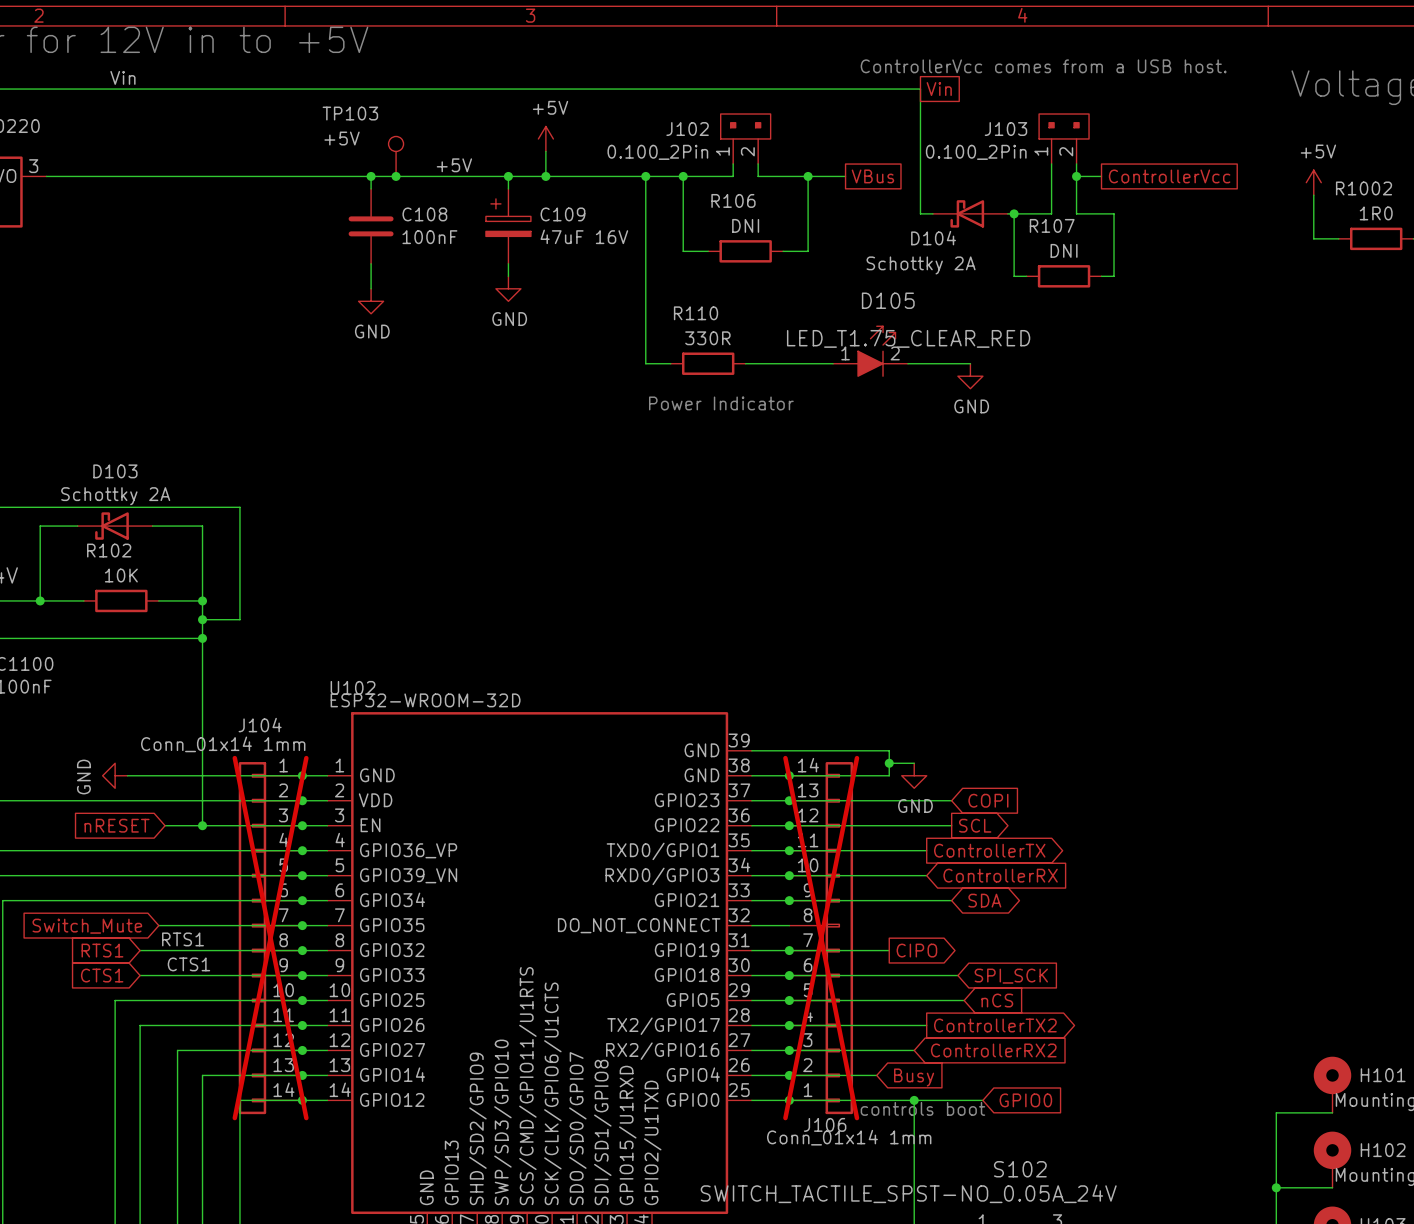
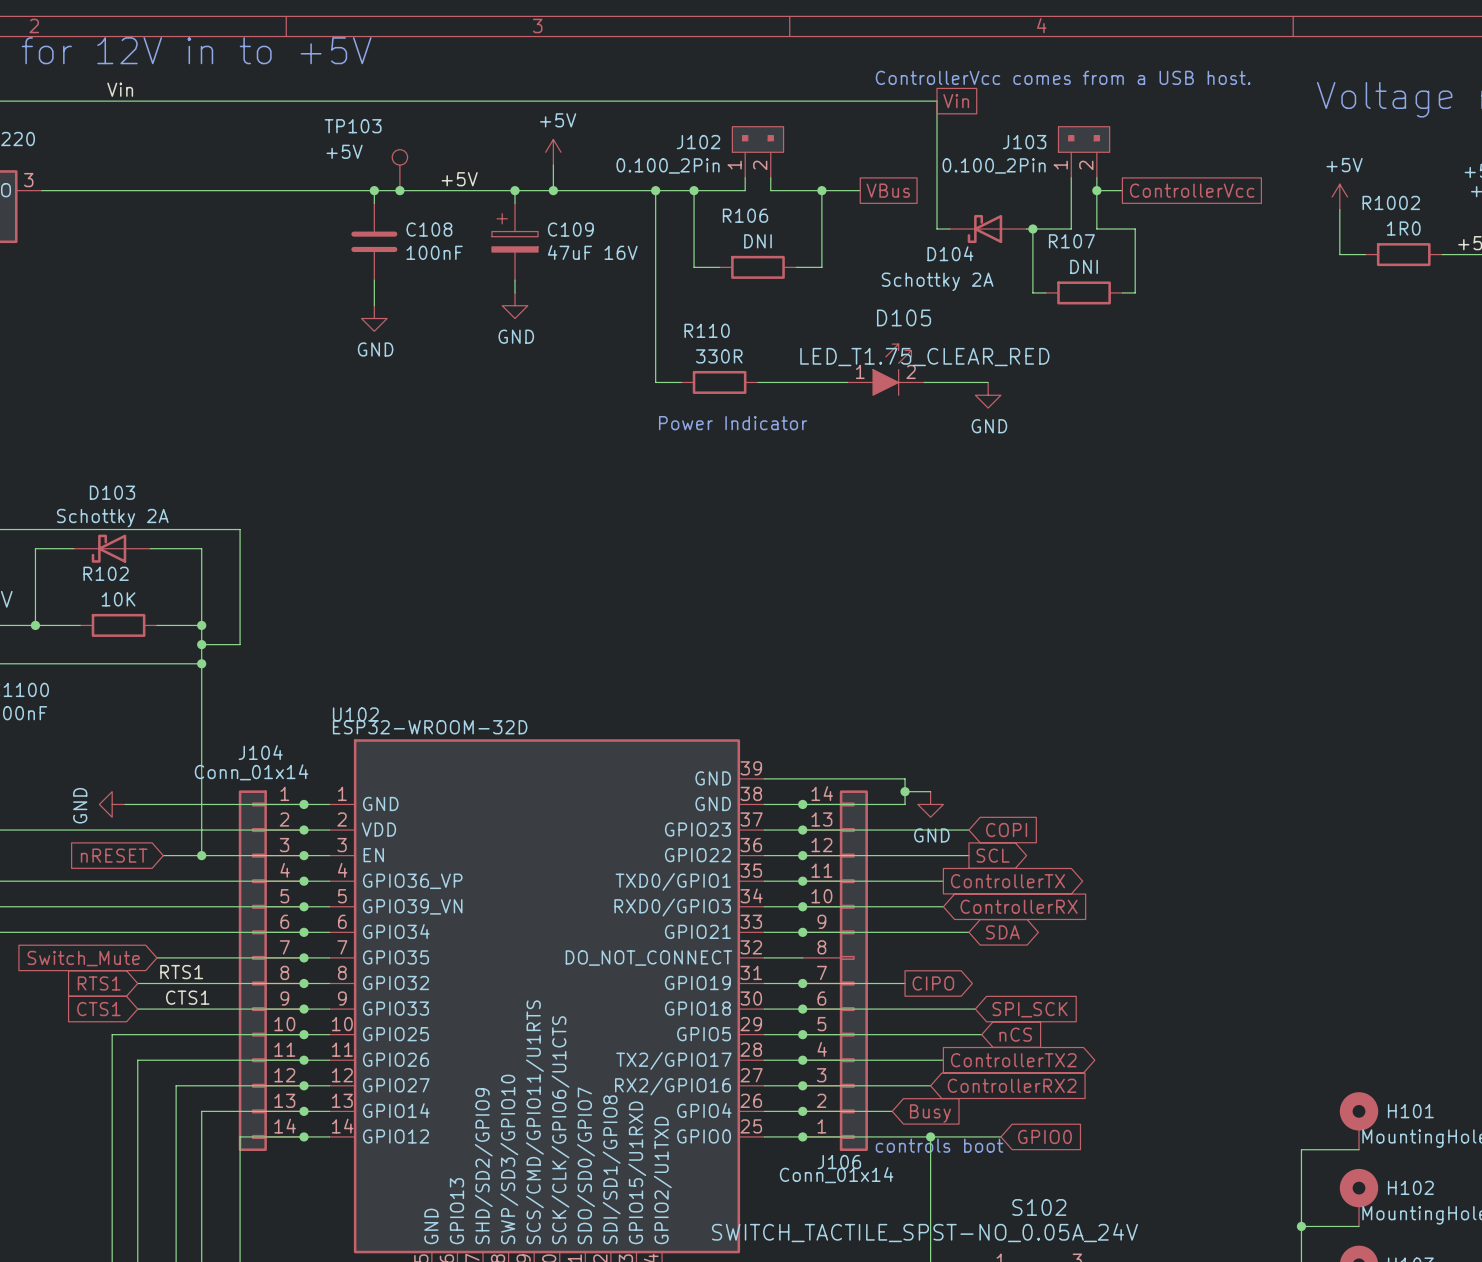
J104 value: Conn_01x14 1mm (223, 744) -> Conn_01x14 (251, 772)
J104 do-not-place cross: (270, 938) -> none
J106 do-not-place cross: (821, 938) -> none
J106 value: Conn_01x14 1mm (849, 1137) -> Conn_01x14 (836, 1175)

